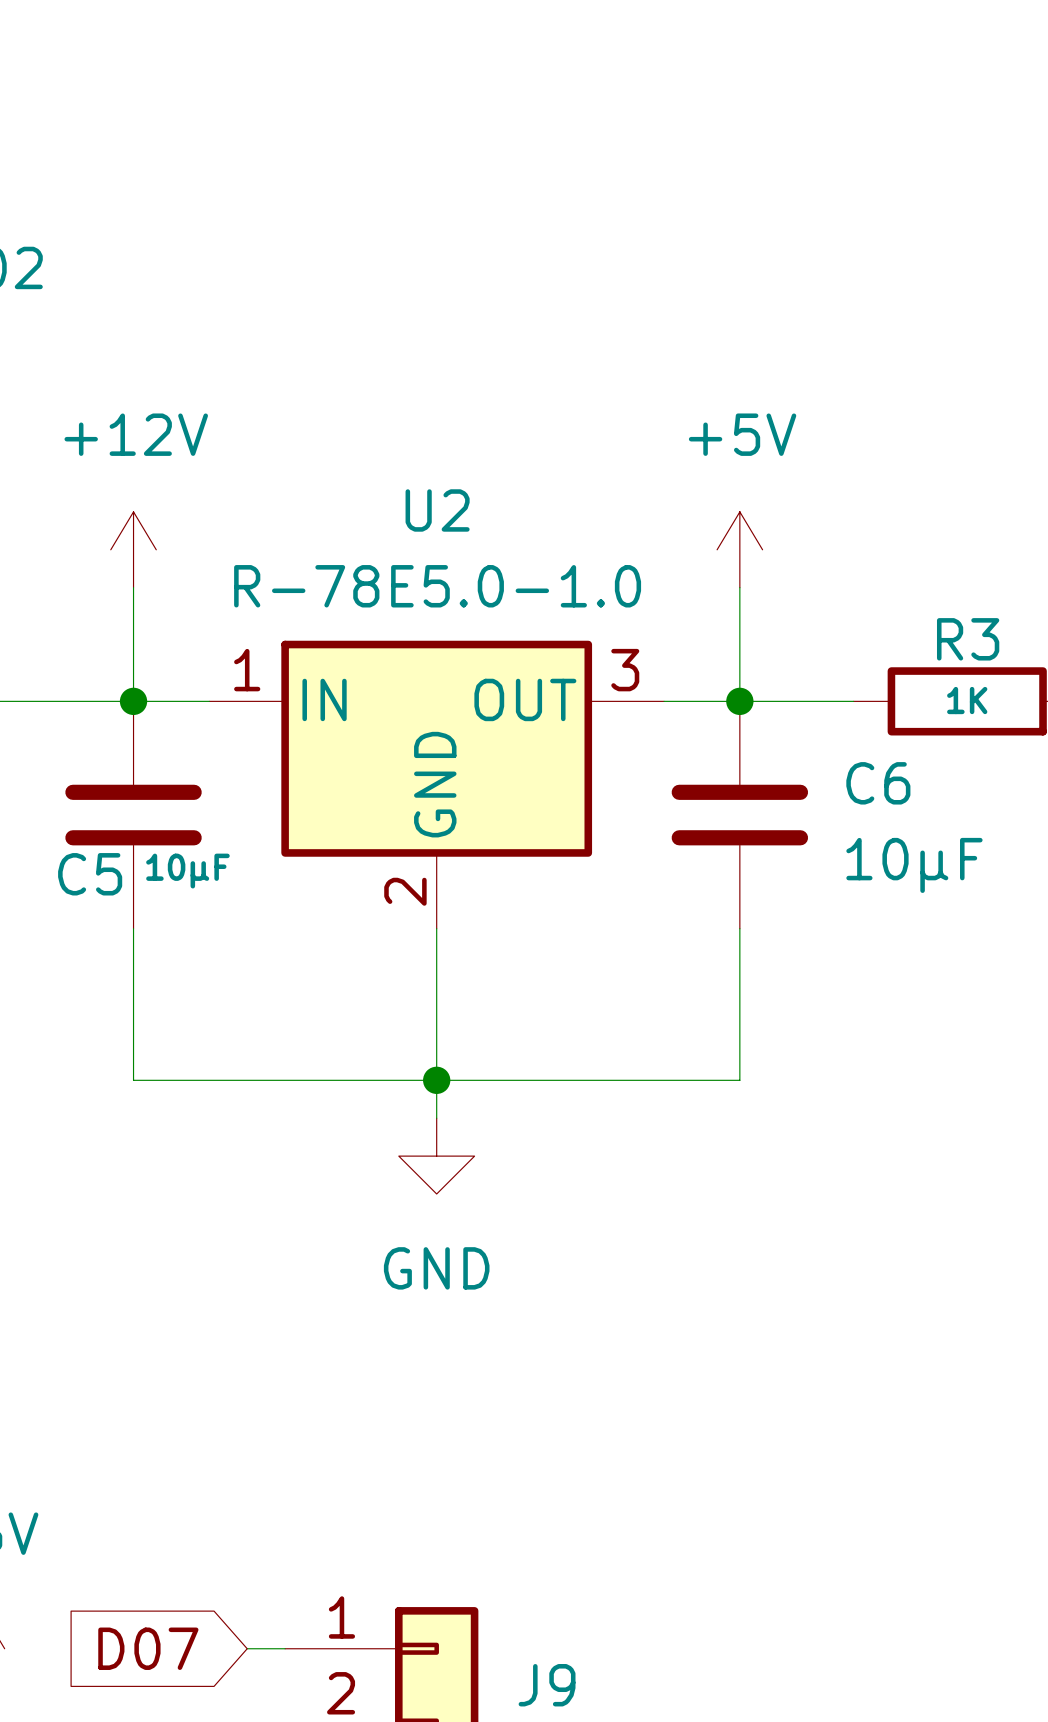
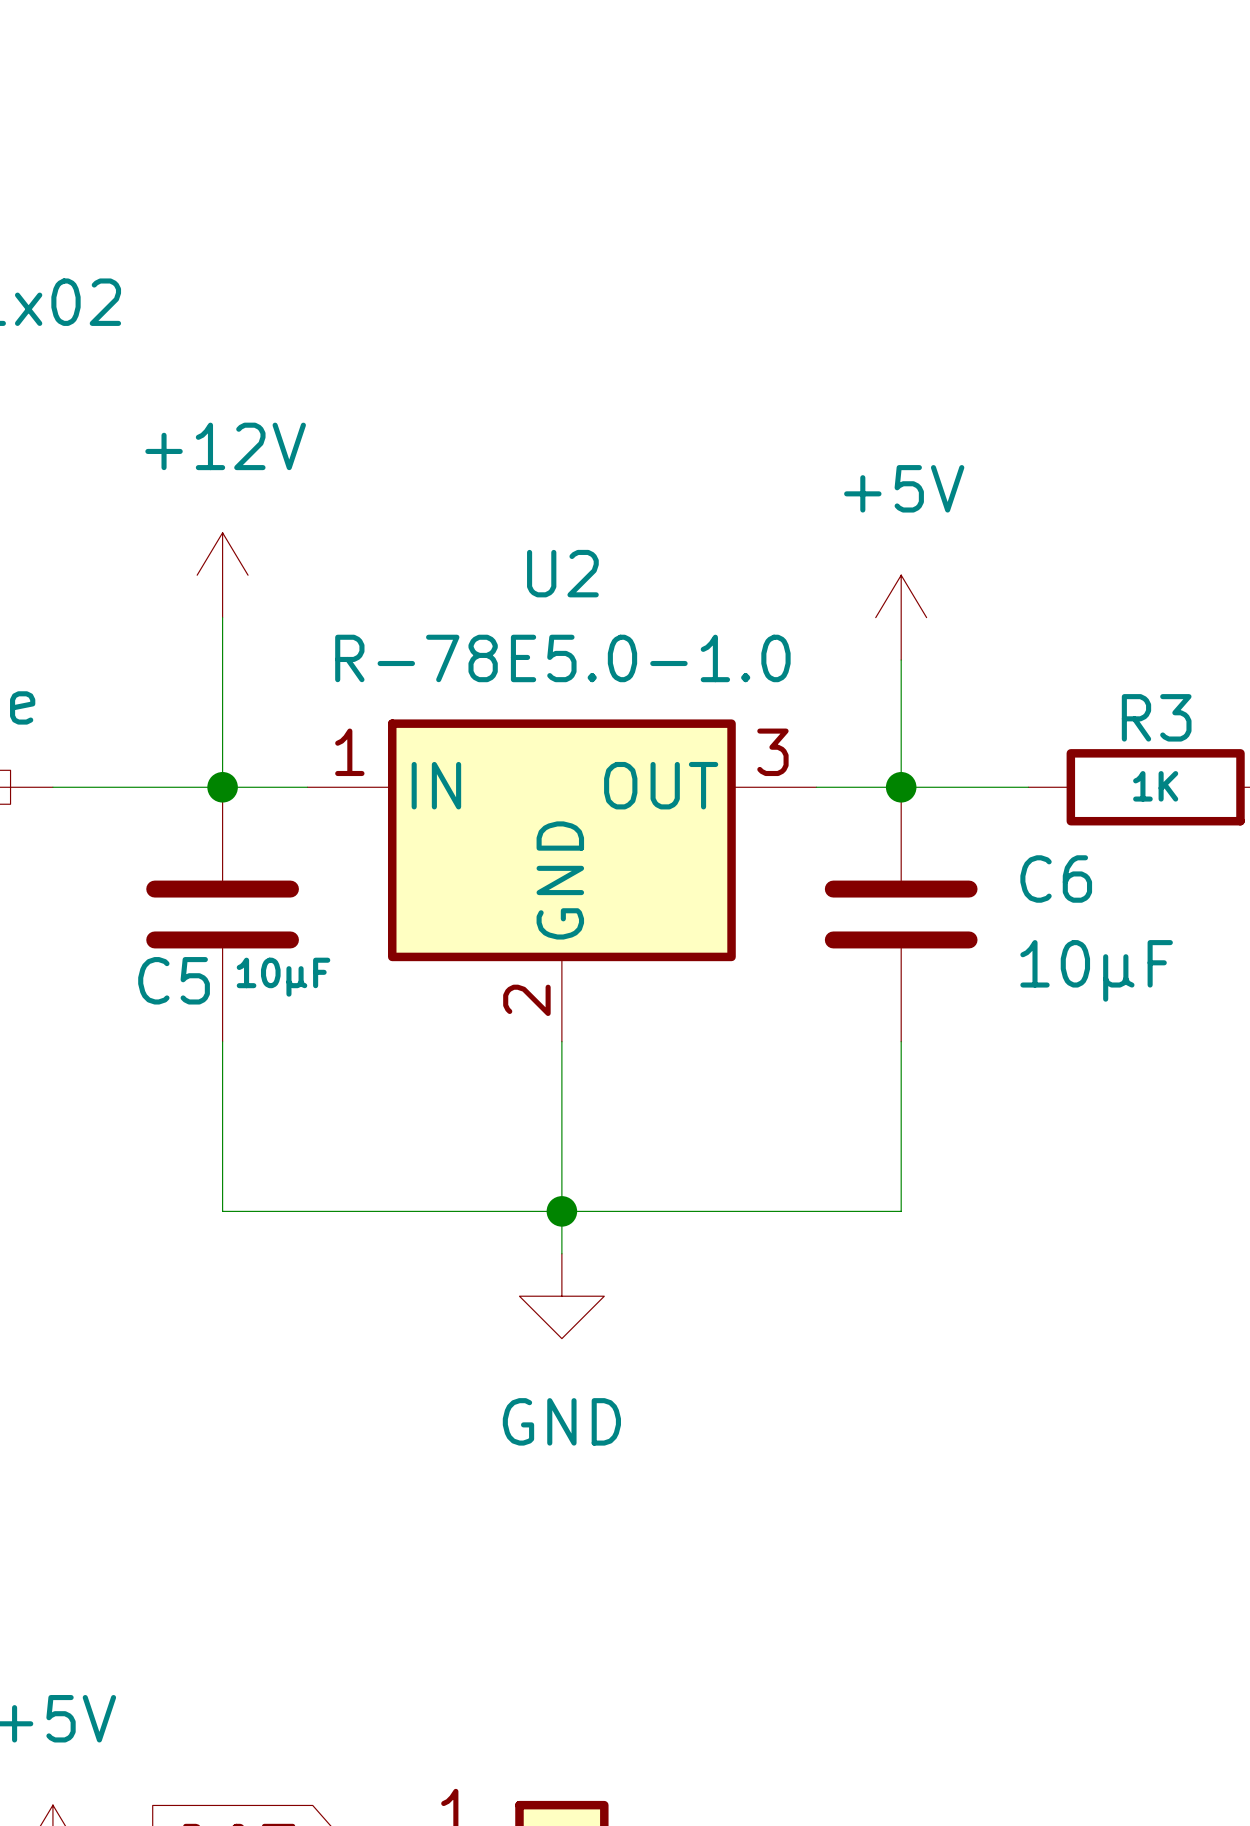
power symbol position: +12V (133, 549) -> +12V (222, 575)

